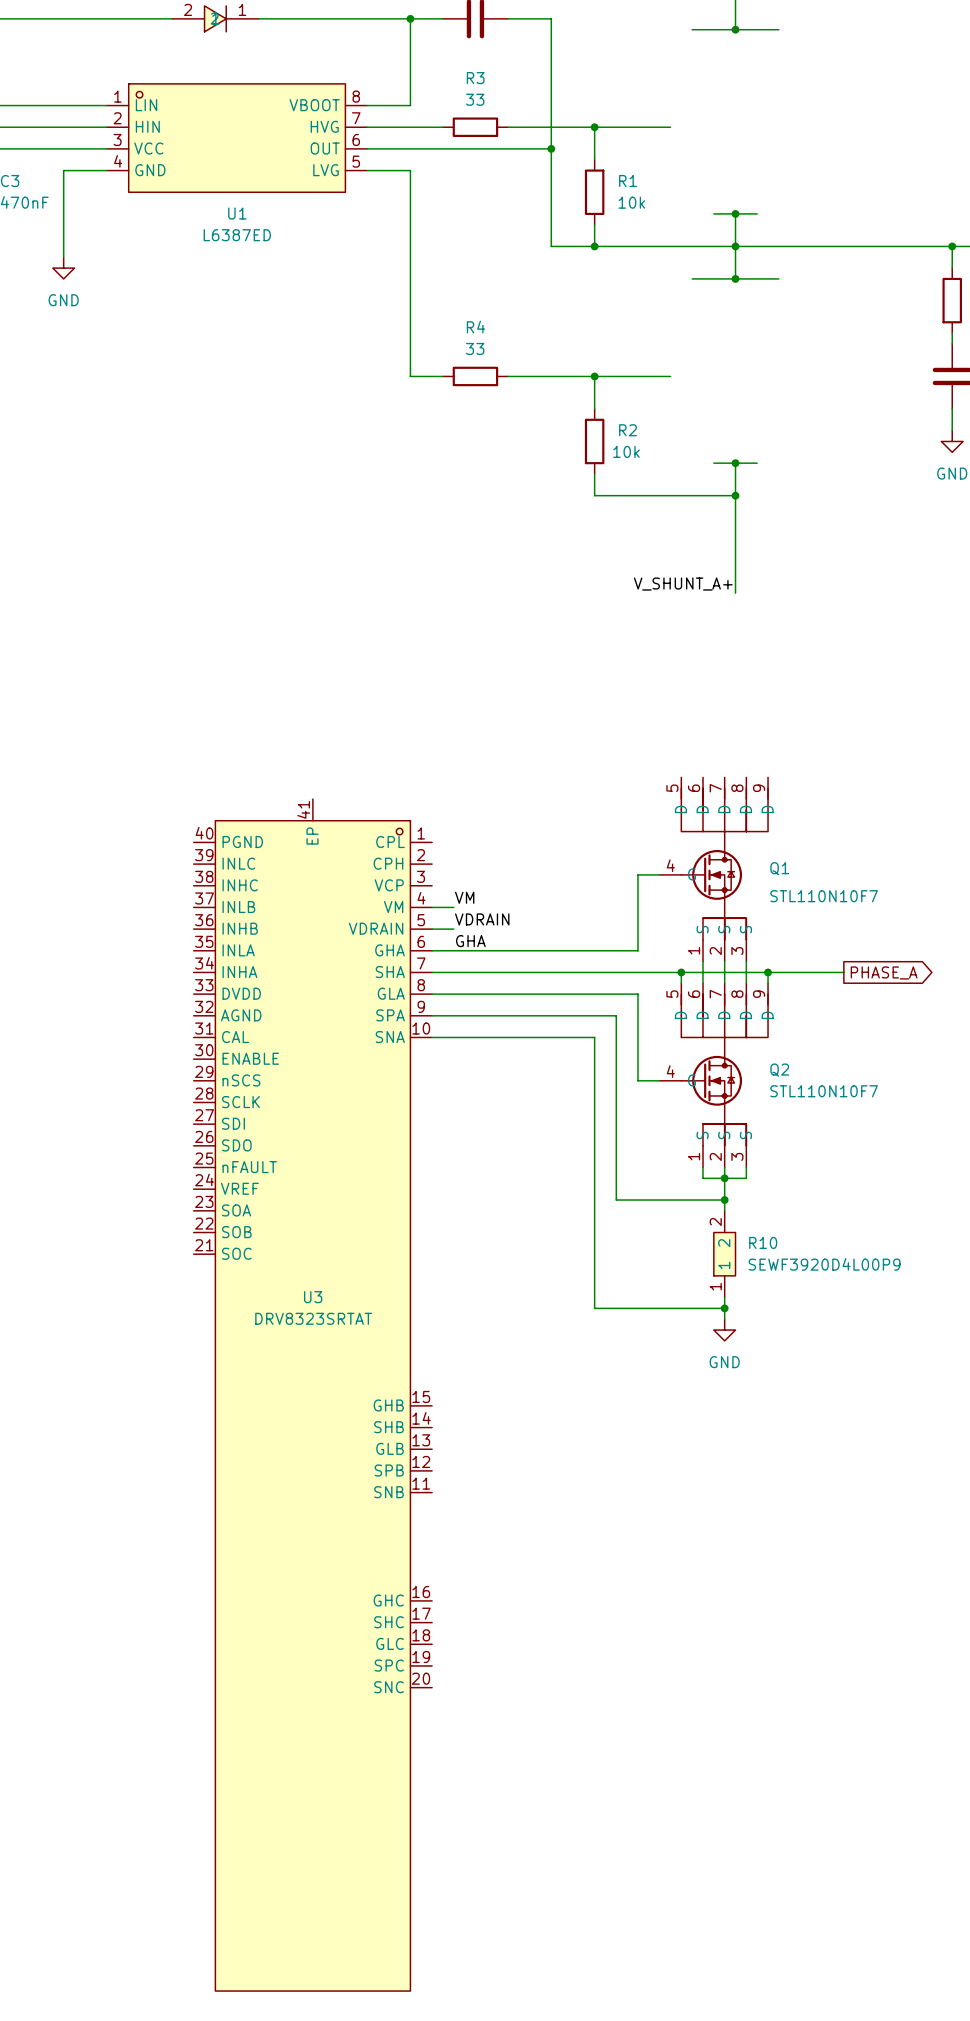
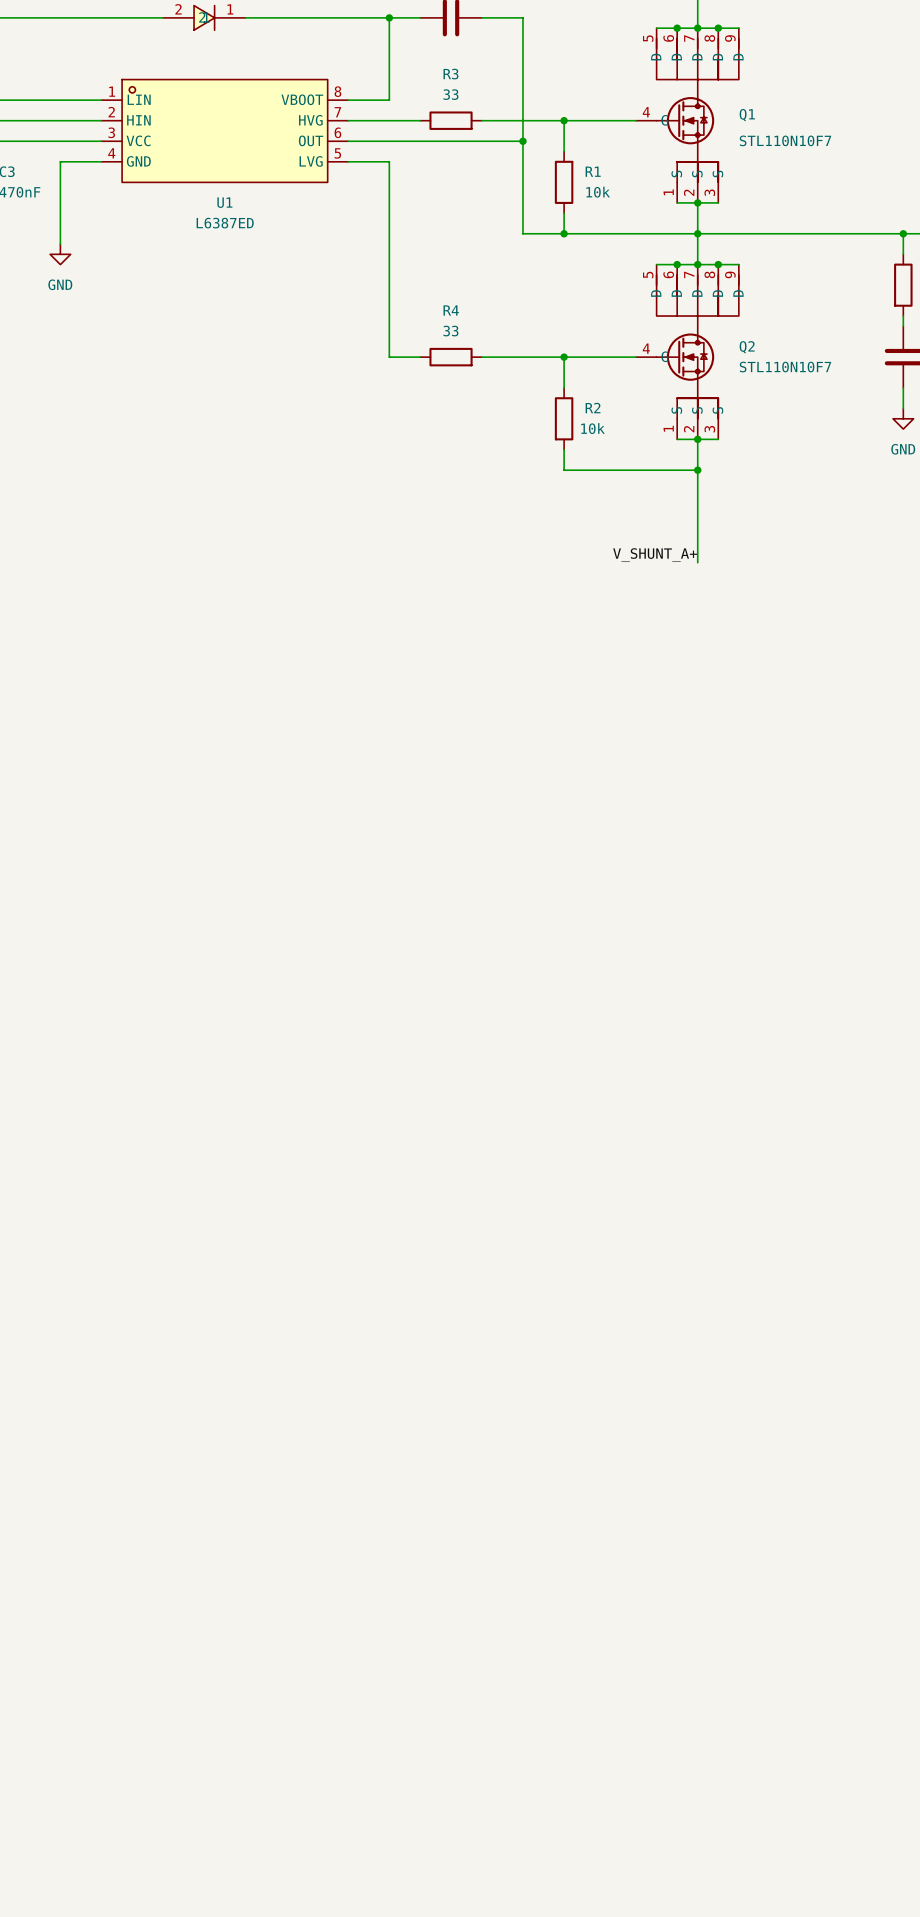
junction: none -> (677, 28)
junction: none -> (718, 28)
junction: none -> (677, 264)
junction: none -> (718, 264)
Q1 position: (713, 869) -> (687, 115)
wire: (659, 874) (637, 874) (637, 950) (432, 950) -> none
label: VM (464, 897) -> none
wire: (432, 907) (453, 907) -> none
label: VDRAIN (482, 919) -> none
wire: (432, 929) (453, 929) -> none
label: GHA (470, 941) -> none
wire: (703, 961) (703, 983) -> none
wire: (724, 961) (724, 983) -> none
wire: (746, 961) (746, 983) -> none
wire: (432, 972) (843, 972) -> none
wire: (681, 972) (681, 983) -> none
junction: (681, 972) -> none
wire: (768, 972) (768, 983) -> none
junction: (768, 972) -> none
global label: PHASE_A (884, 972) -> none
wire: (432, 994) (637, 994) (637, 1080) (659, 1080) -> none
wire: (432, 1015) (616, 1015) (616, 1200) (724, 1200) -> none
wire: (432, 1037) (594, 1037) (594, 1308) (724, 1308) -> none
Q2 position: (713, 1075) -> (687, 351)
wire: (703, 1167) (703, 1178) (746, 1178) (746, 1167) -> none
wire: (724, 1167) (724, 1210) -> none
junction: (724, 1178) -> none
junction: (724, 1200) -> none
R10: SEWF3920D4L00P9 (724, 1254) -> none
wire: (724, 1297) (724, 1319) -> none
junction: (724, 1308) -> none
power symbol: GND (724, 1330) -> none
U3: DRV8323SRTAT (312, 1395) -> none

